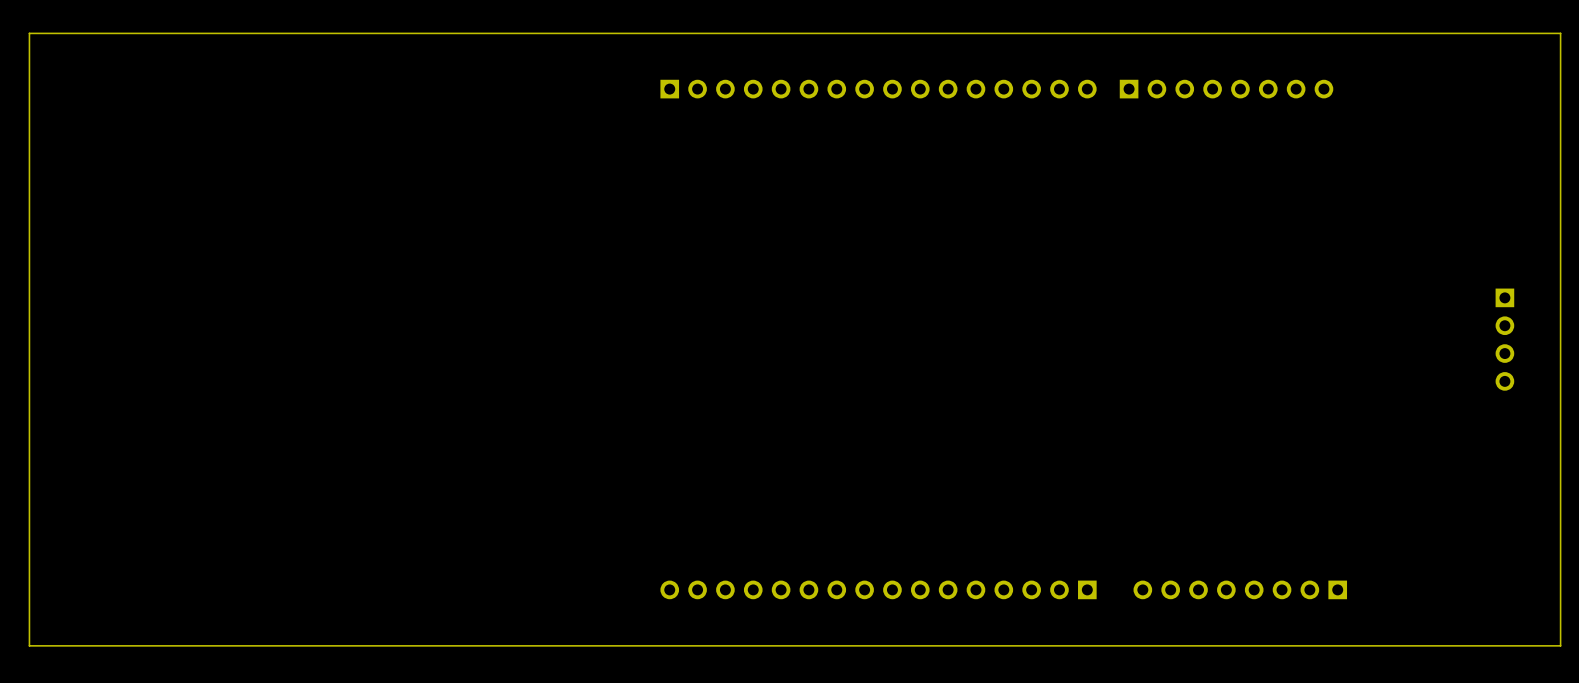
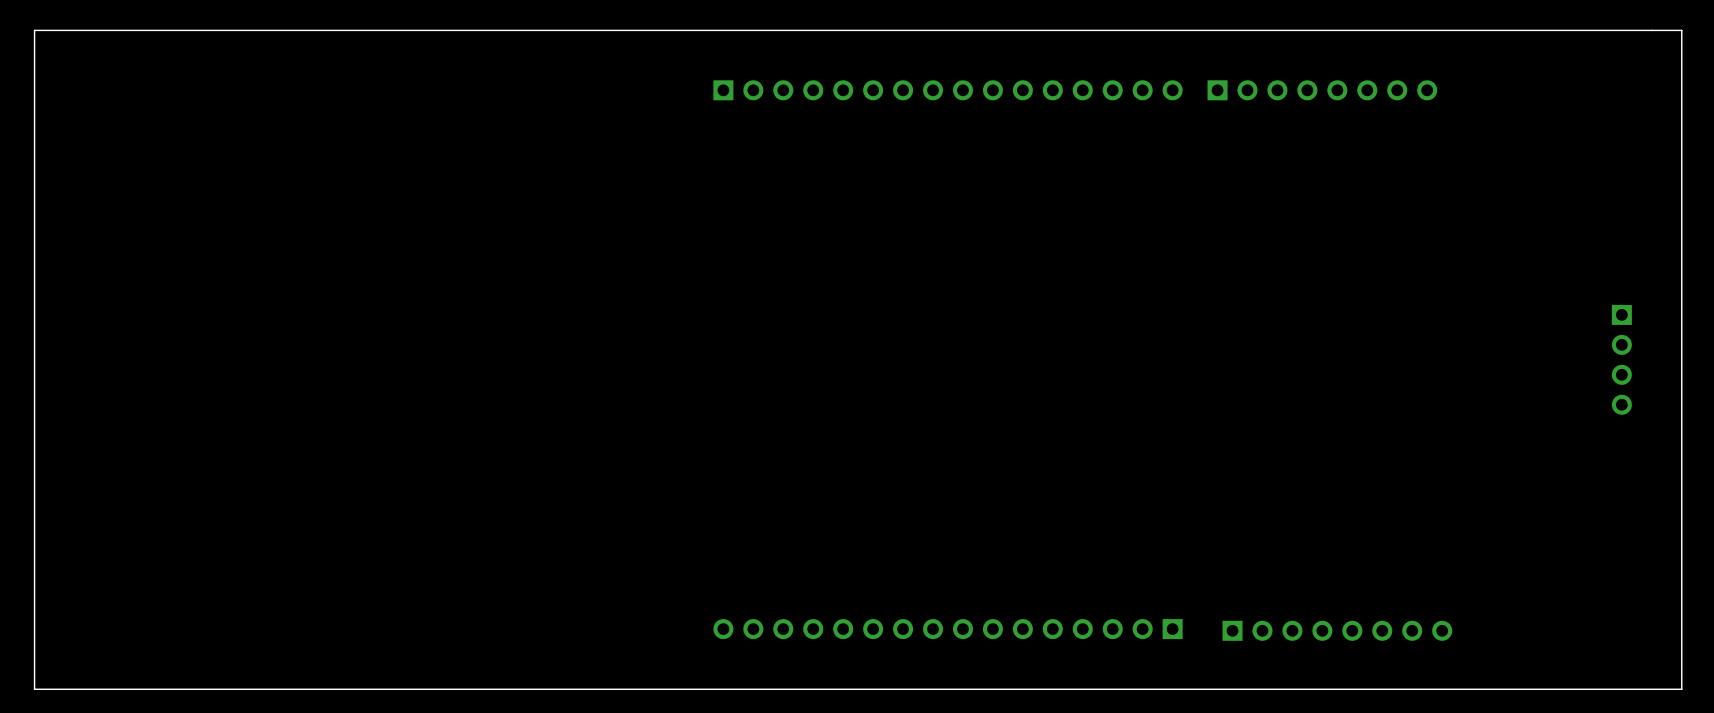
part rotation: 0° (1240, 589) -> 180° (1337, 630)

